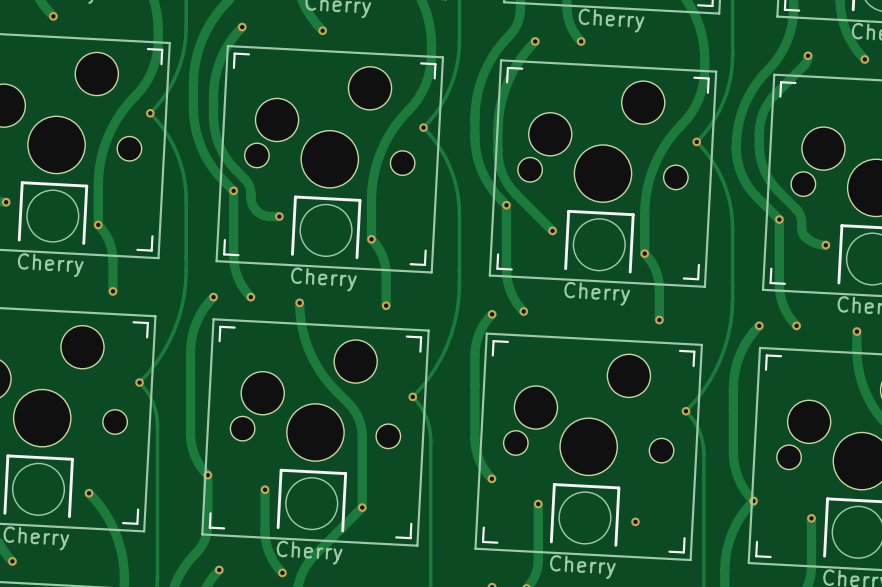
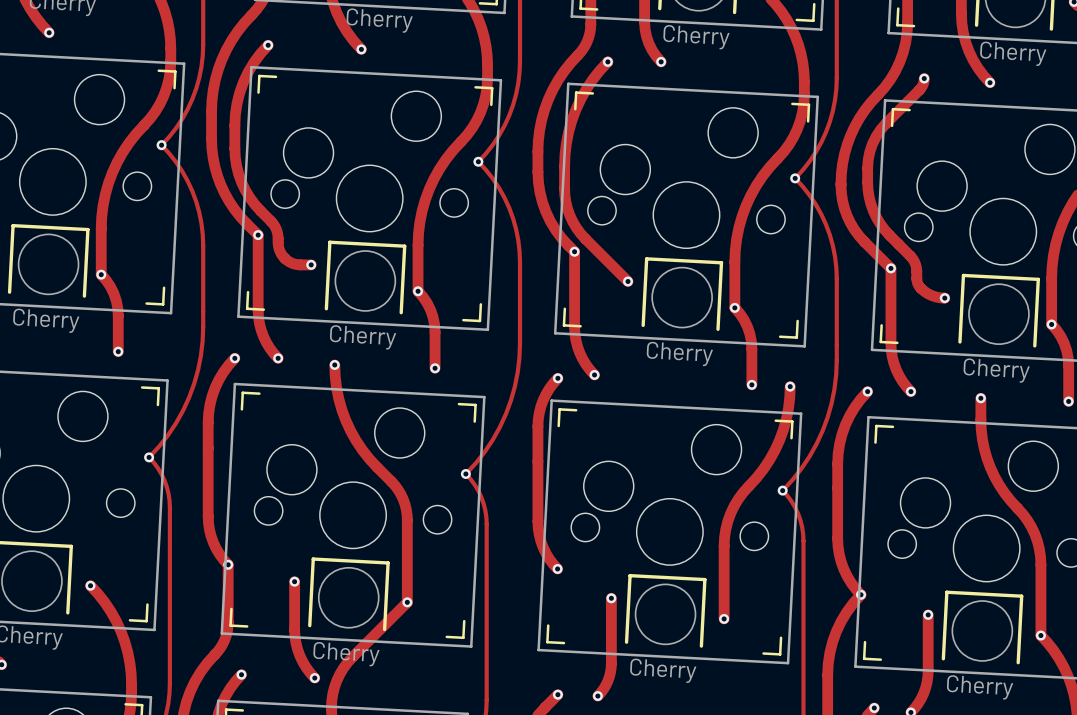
track: none -> (790, 386) (786, 419) (774, 450) (763, 469) (738, 498) (727, 521) (724, 546) (724, 618)
via: none -> (790, 386)

